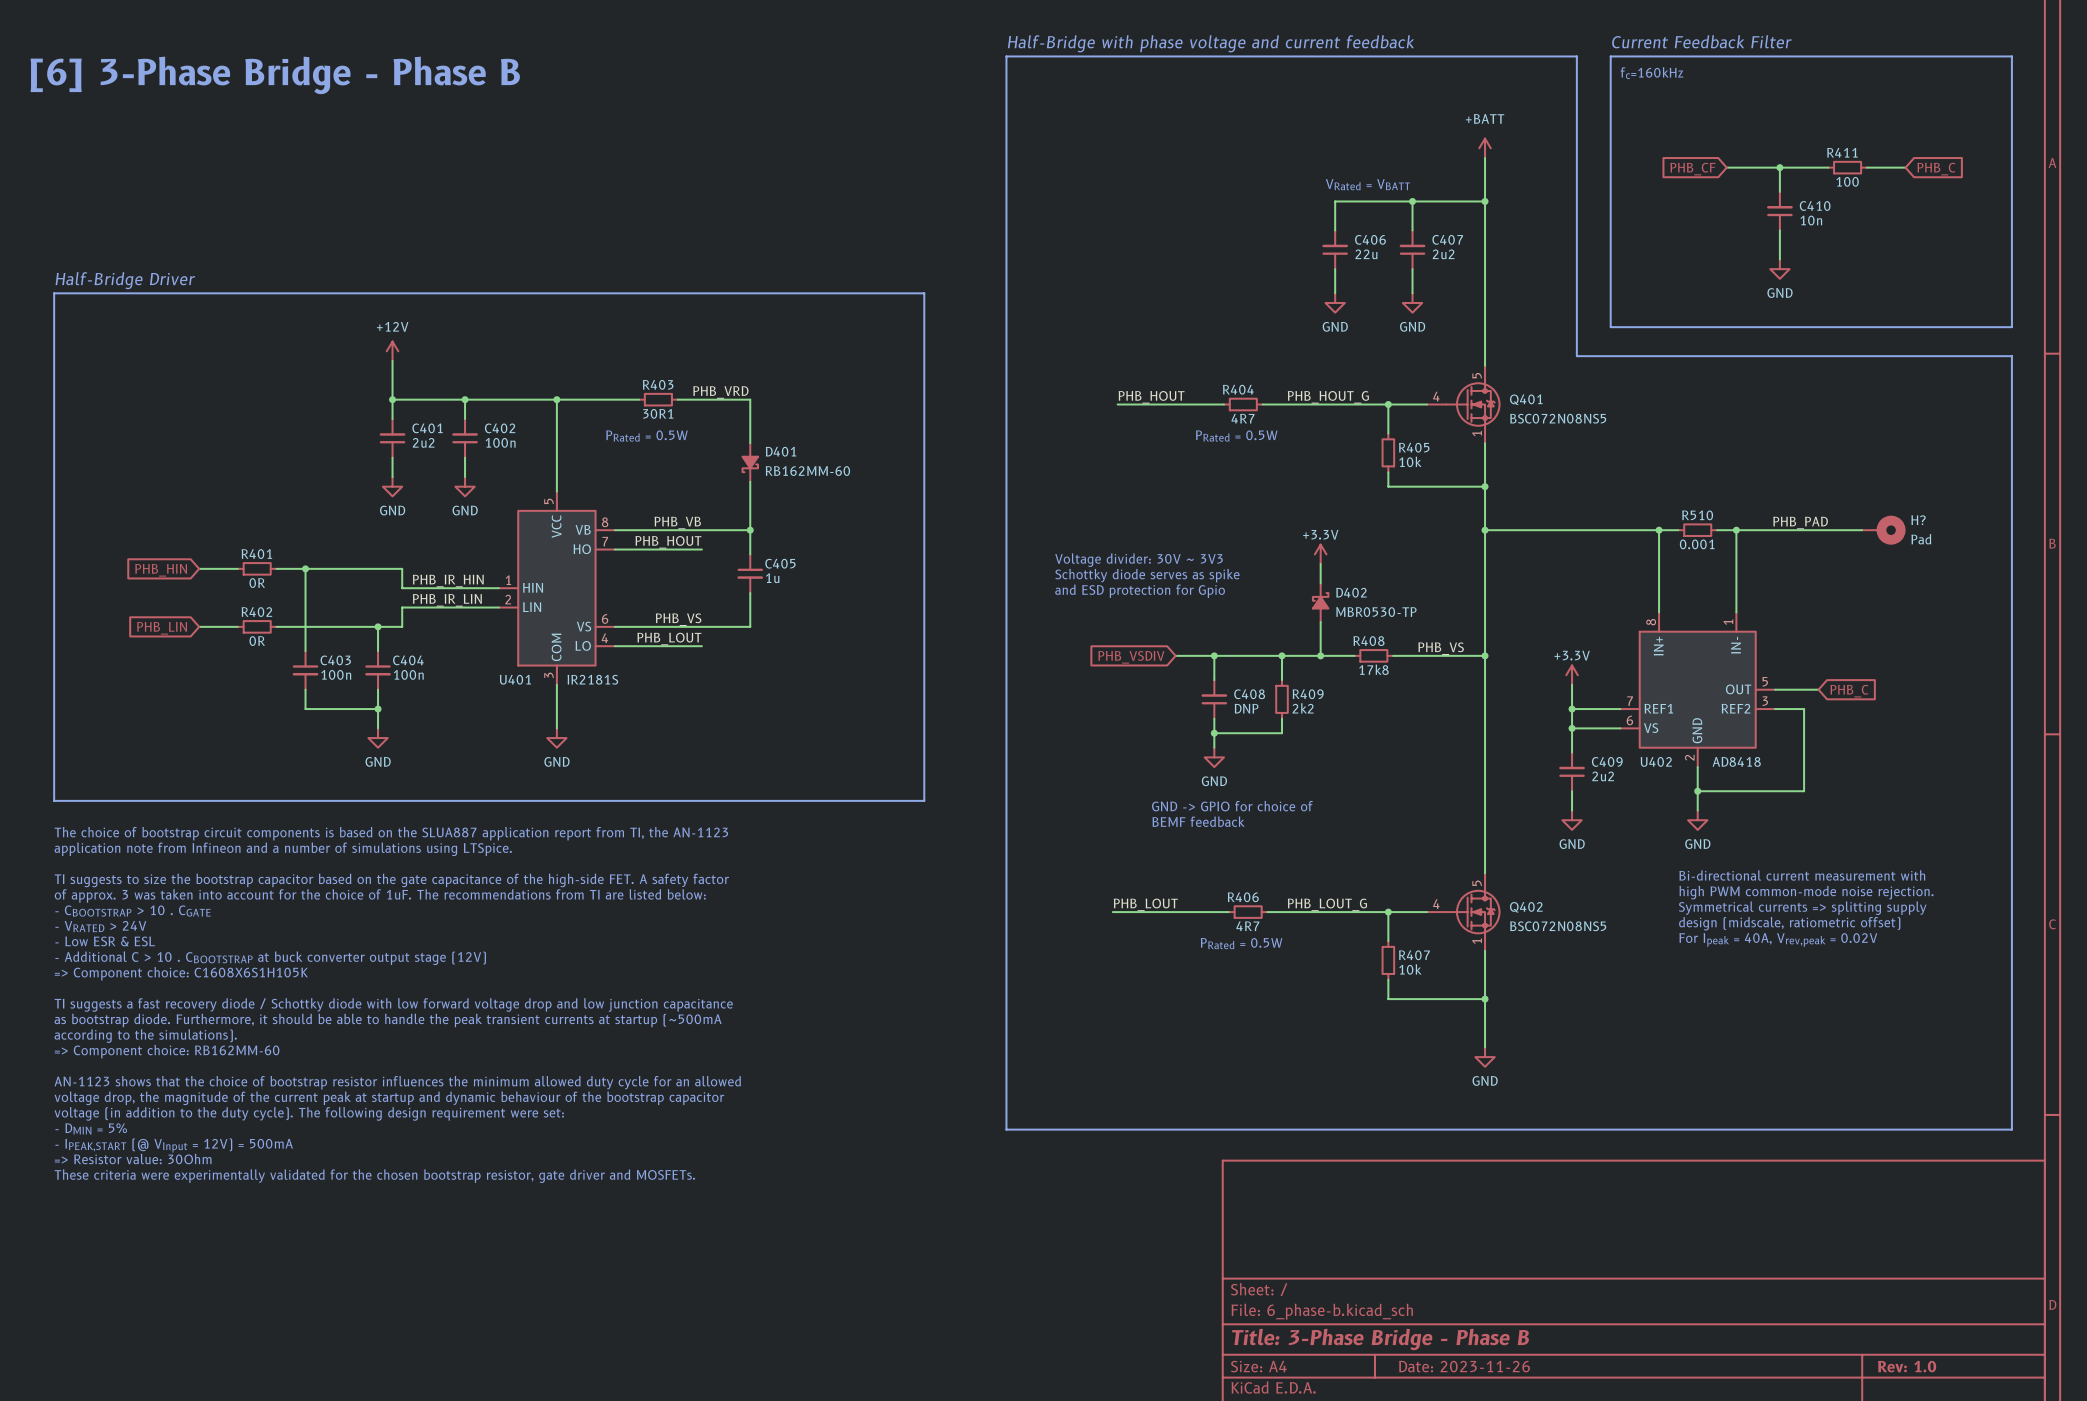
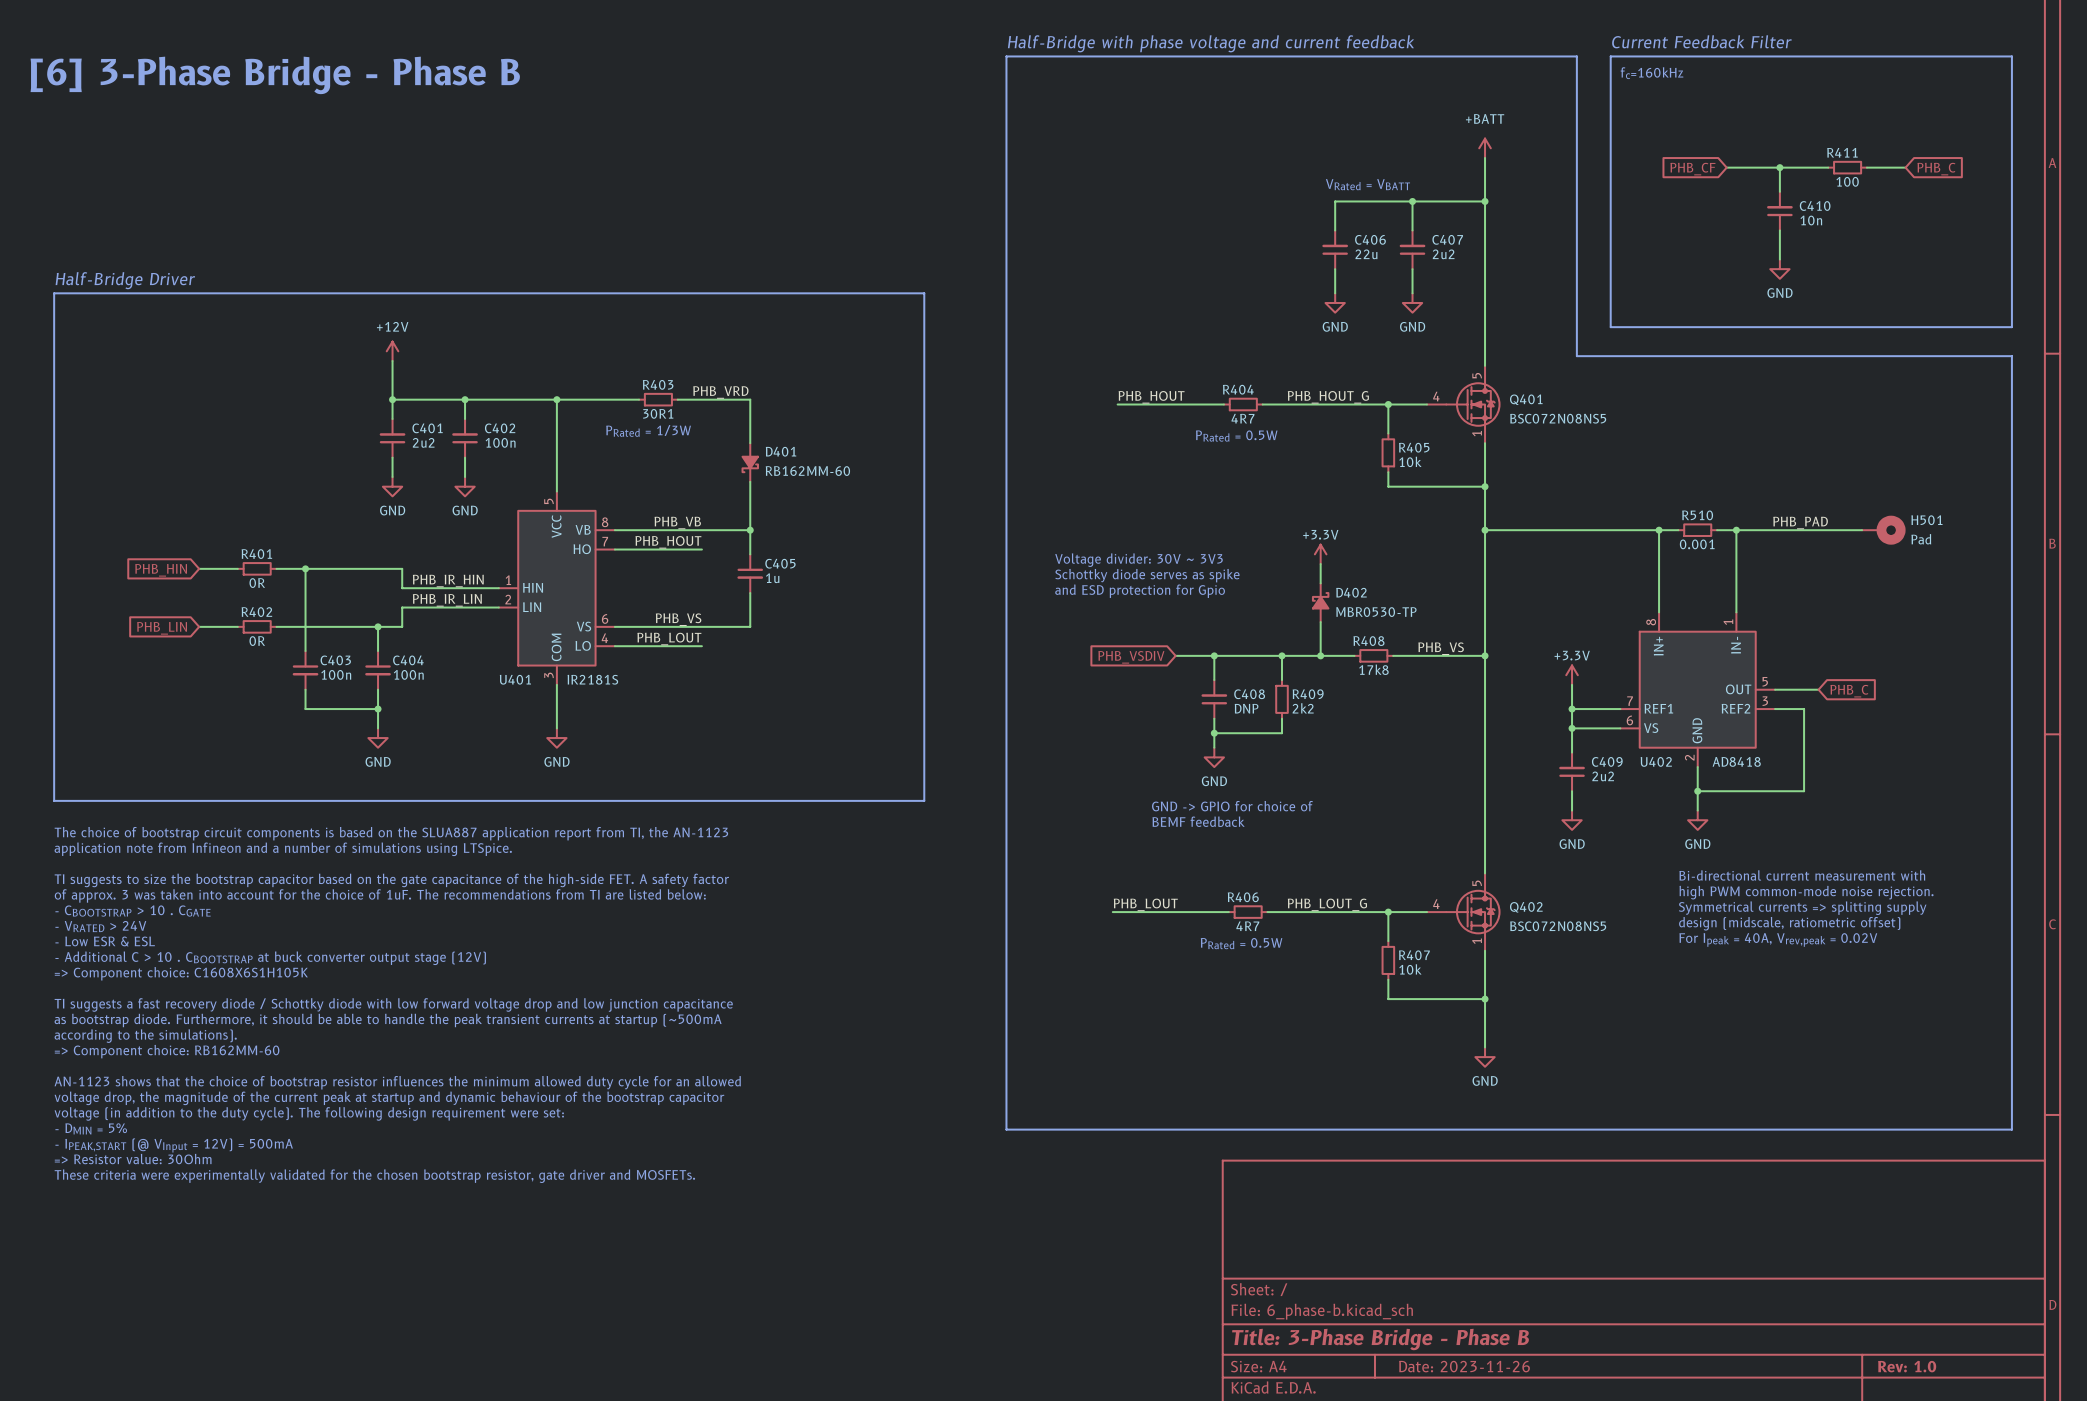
text: PRated = 0.5W (646, 436) -> PRated = 1/3W (648, 430)
H? name: H? (1918, 520) -> H501 (1926, 520)

